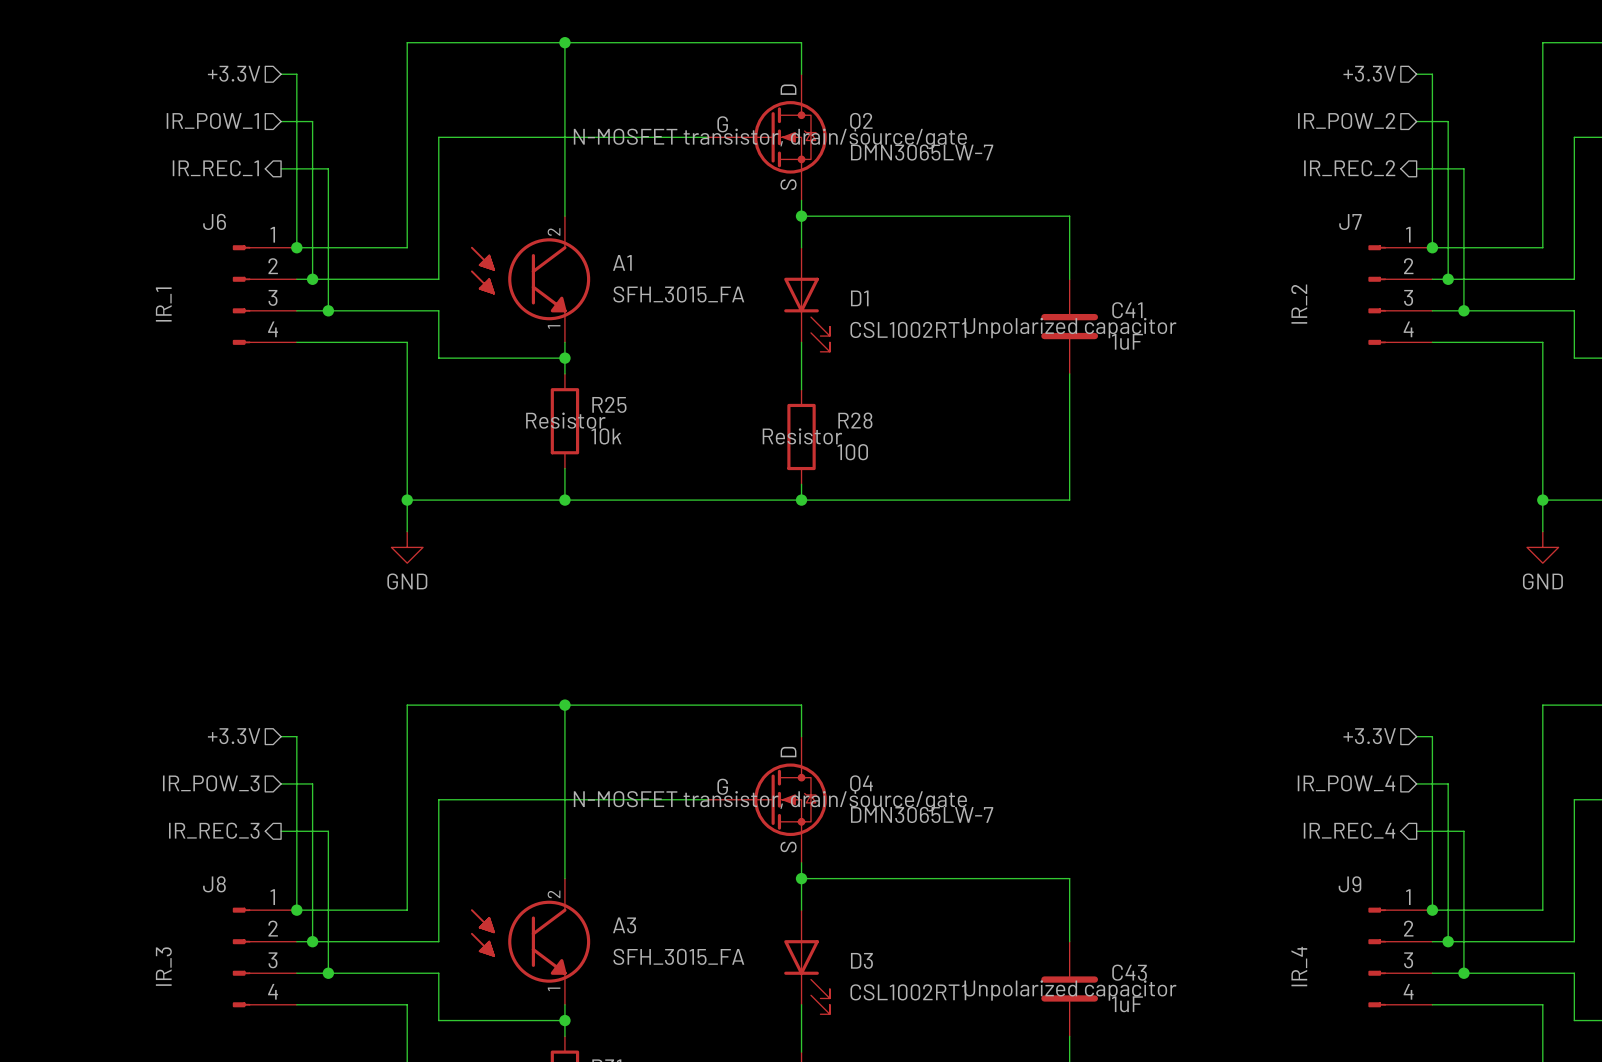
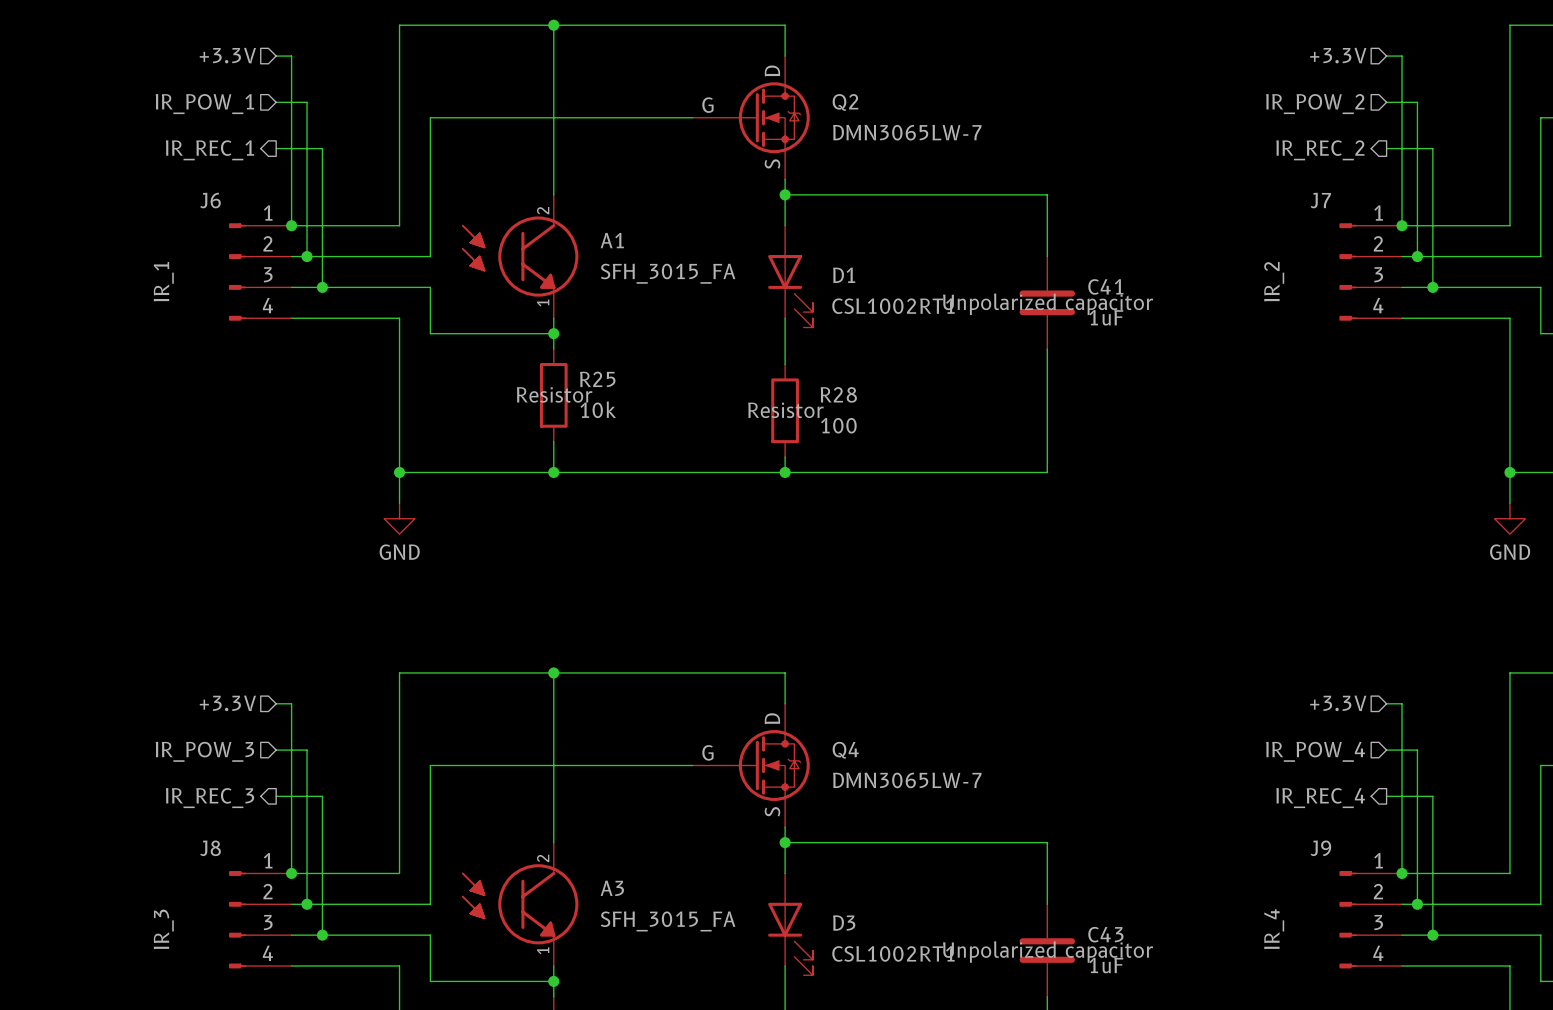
Q2 text: N-MOSFET transistor, drain/source/gate (770, 138) -> none
Q4 text: N-MOSFET transistor, drain/source/gate (770, 801) -> none

